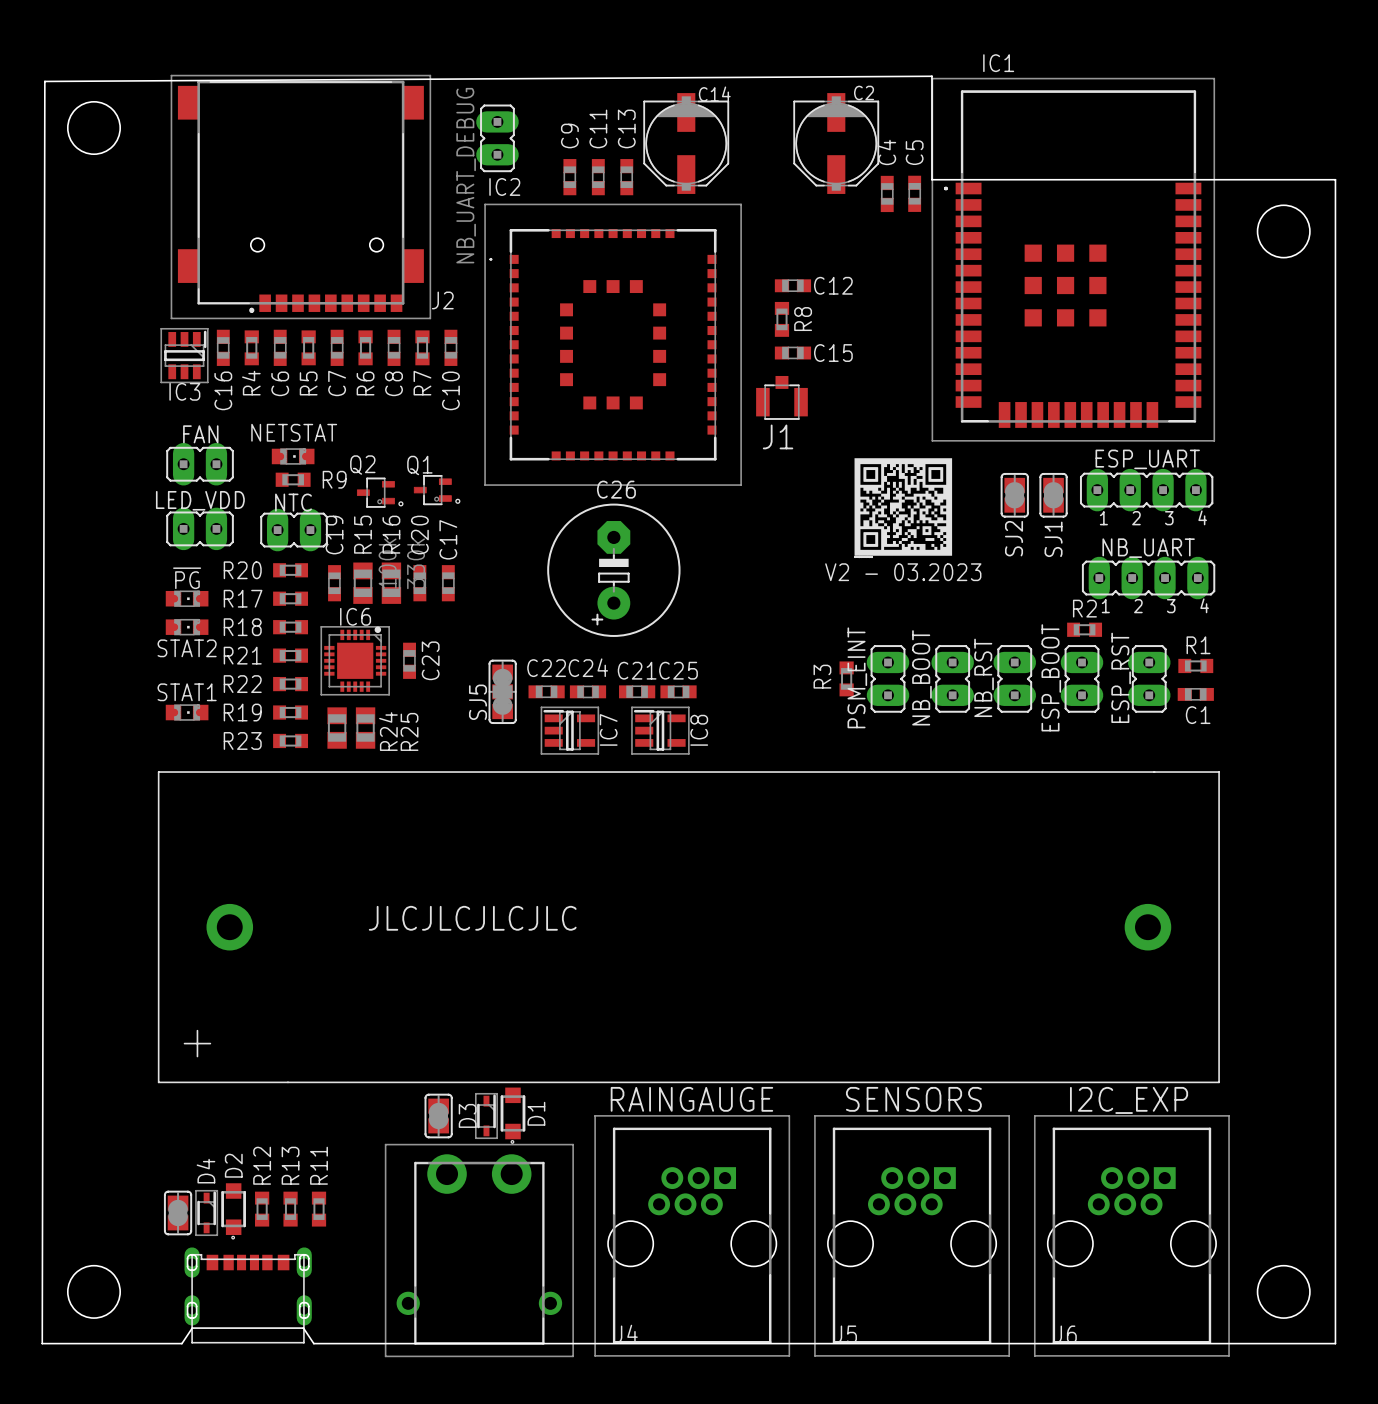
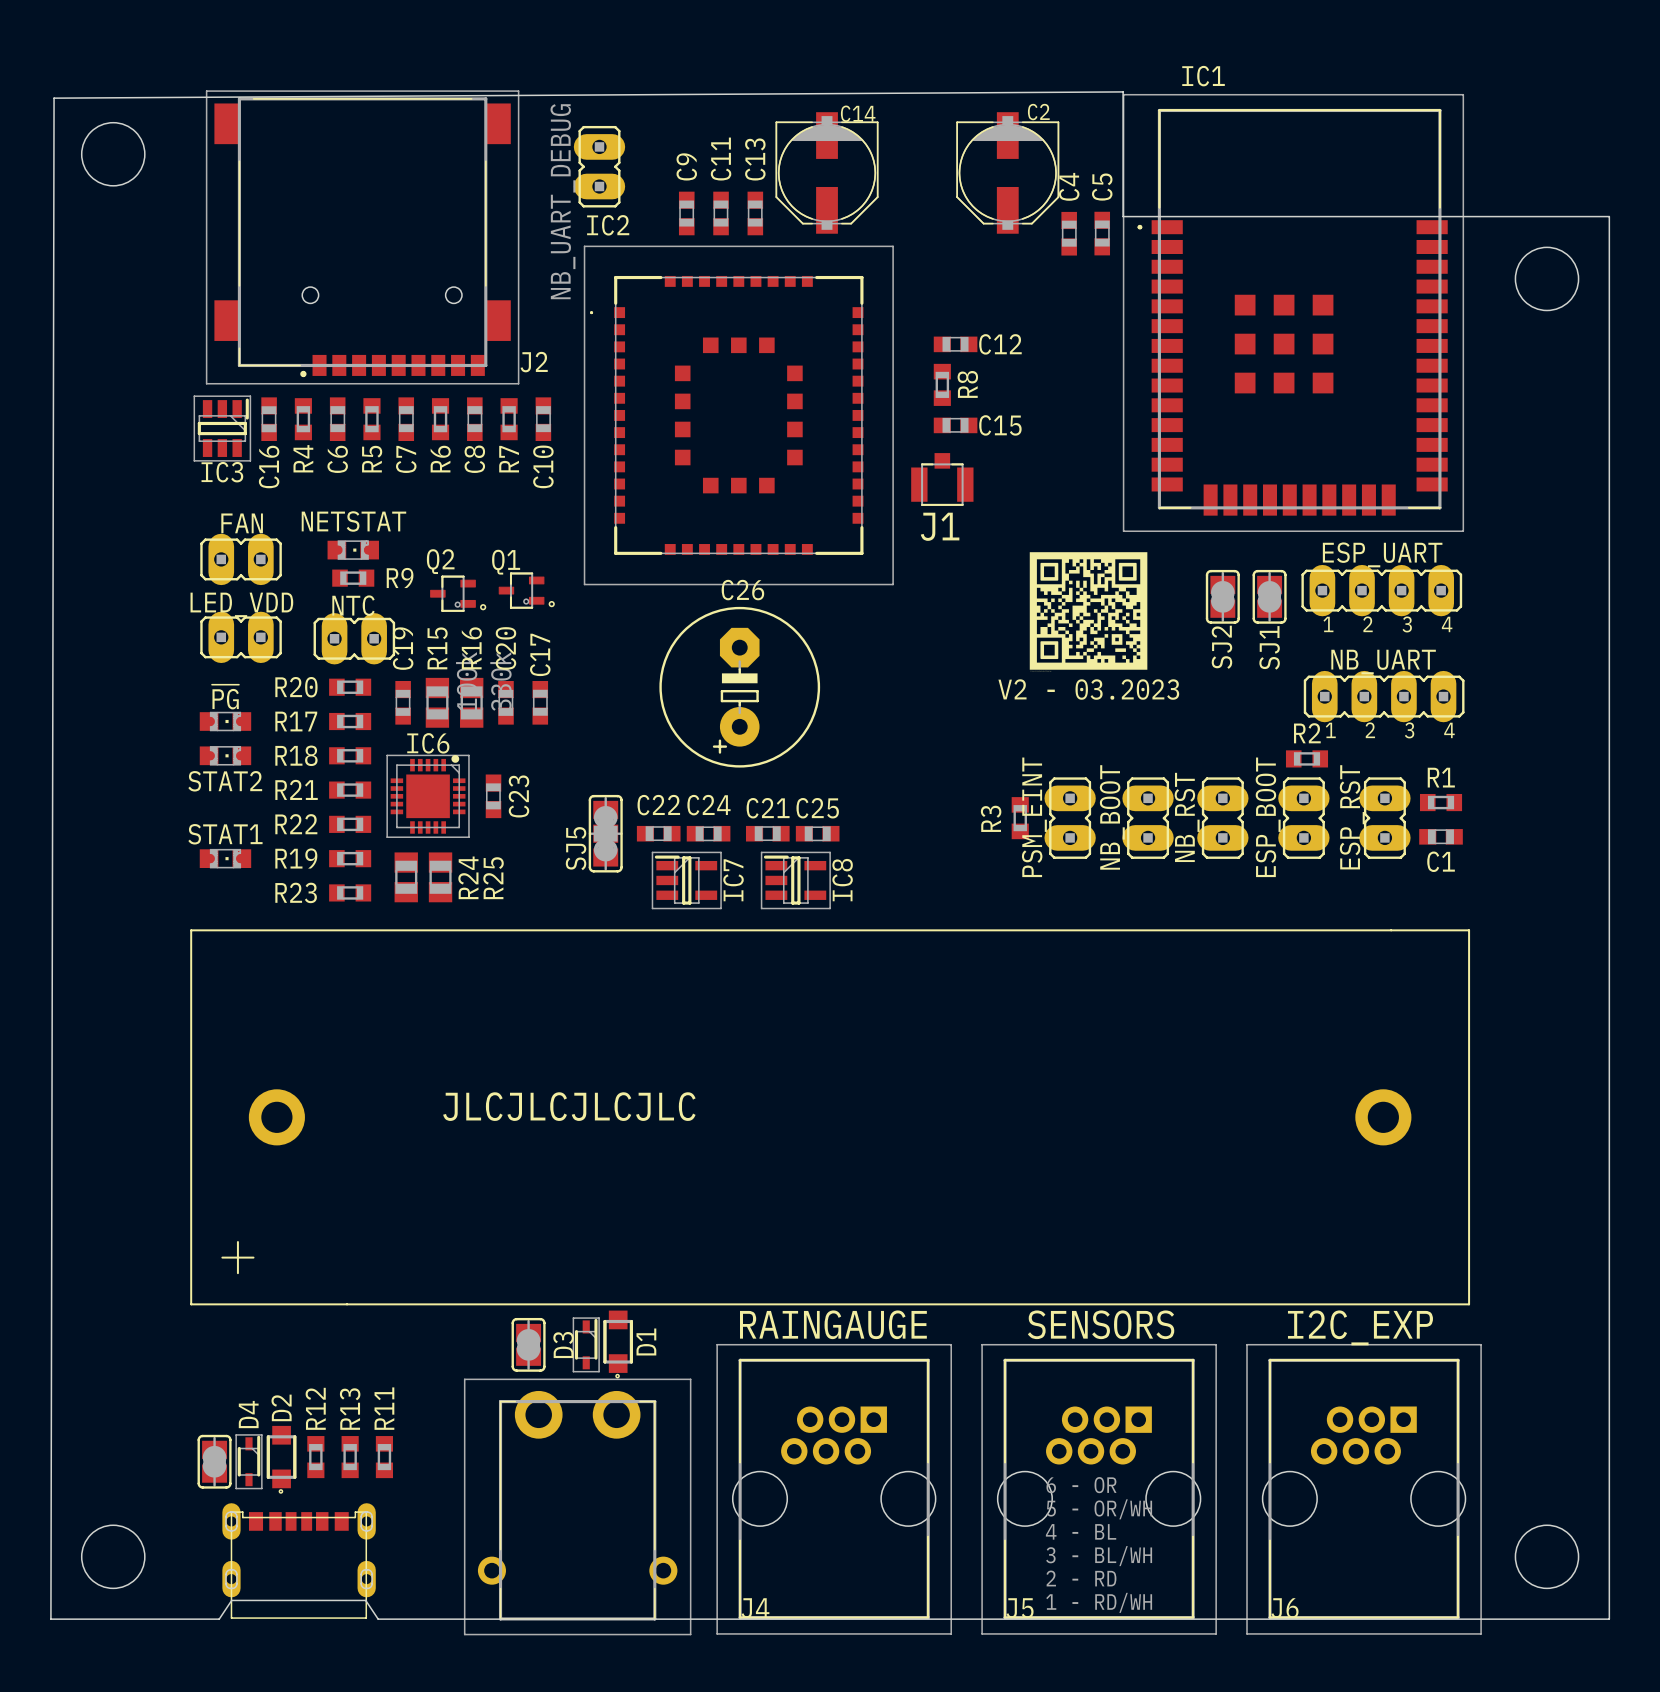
text: none -> 6 - OR (1081, 1485)
text: none -> 5 - OR/WH (1099, 1509)
text: none -> 4 - BL (1081, 1531)
text: none -> 3 - BL/WH (1099, 1556)
text: none -> 2 - RD (1081, 1578)
text: none -> 1 - RD/WH (1099, 1602)

